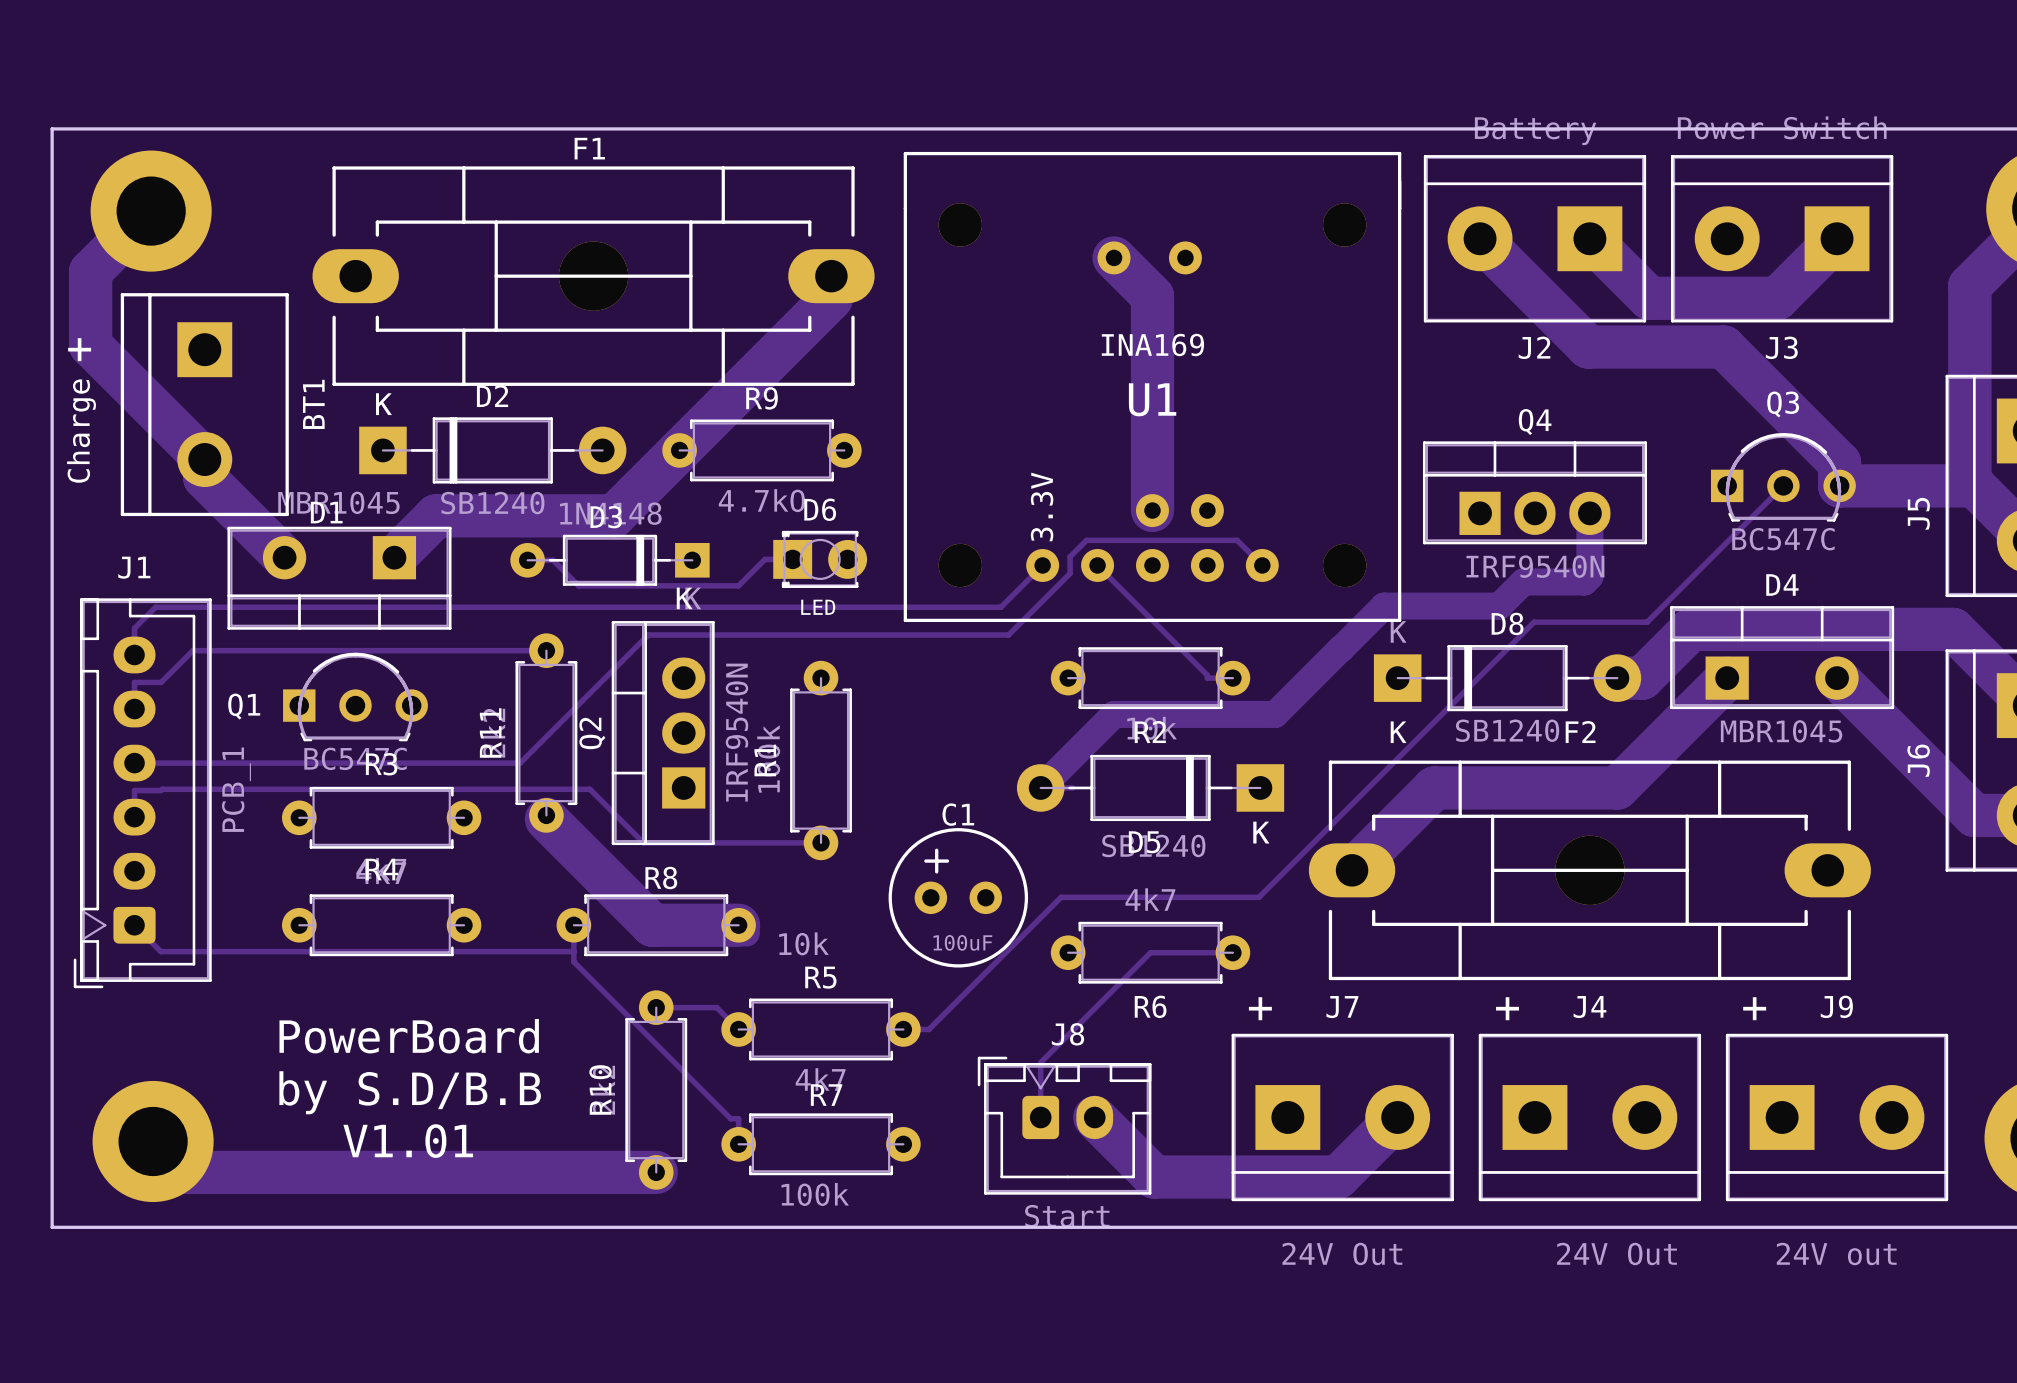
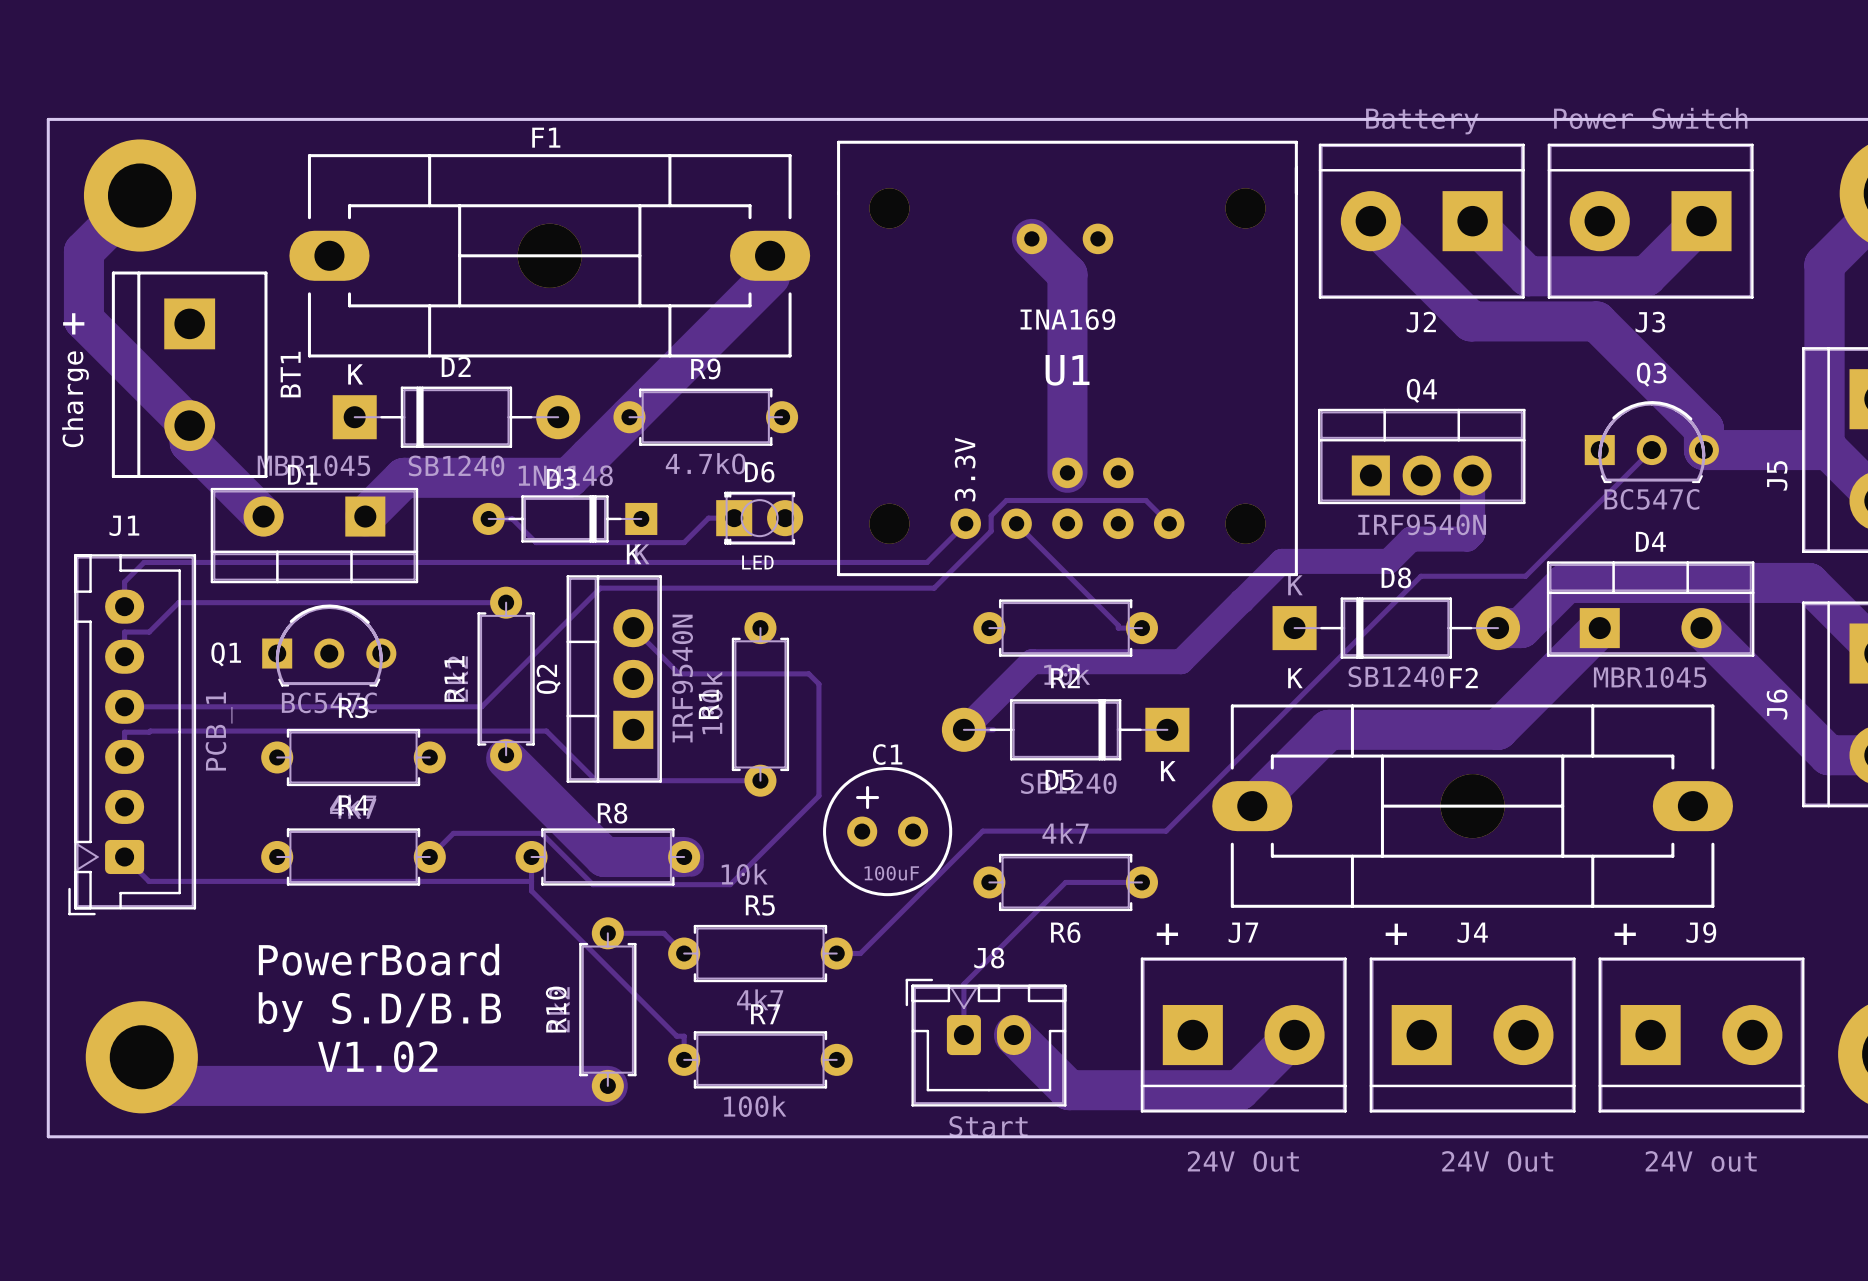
track: none -> (633, 628) (679, 673) (808, 673) (818, 684) (818, 795) (730, 884) (592, 884) (541, 833) (453, 833) (429, 857)
text: V1.01 (408, 1141) -> V1.02 (377, 1056)

